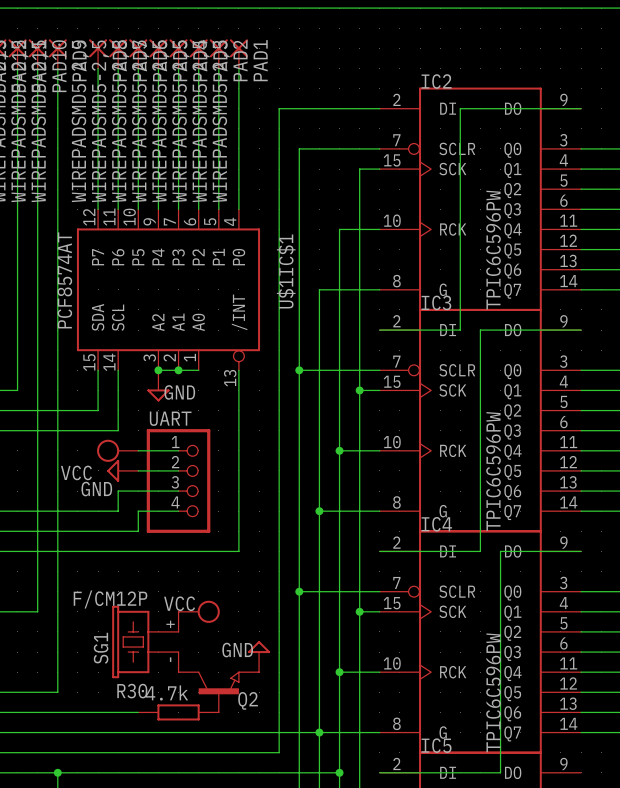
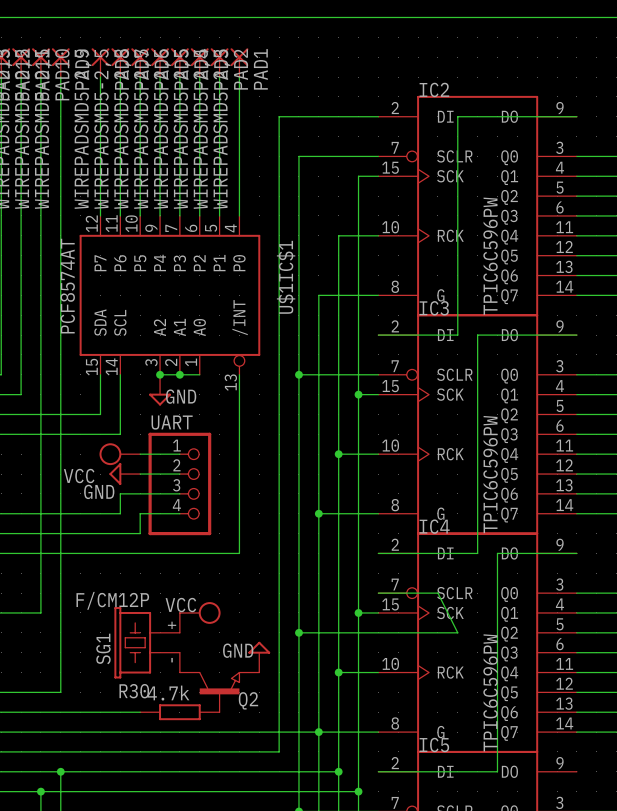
wire: (299, 591) (379, 591) -> (298, 632) (457, 632) (437, 593) (378, 593)
junction position: (299, 591) -> (298, 632)

